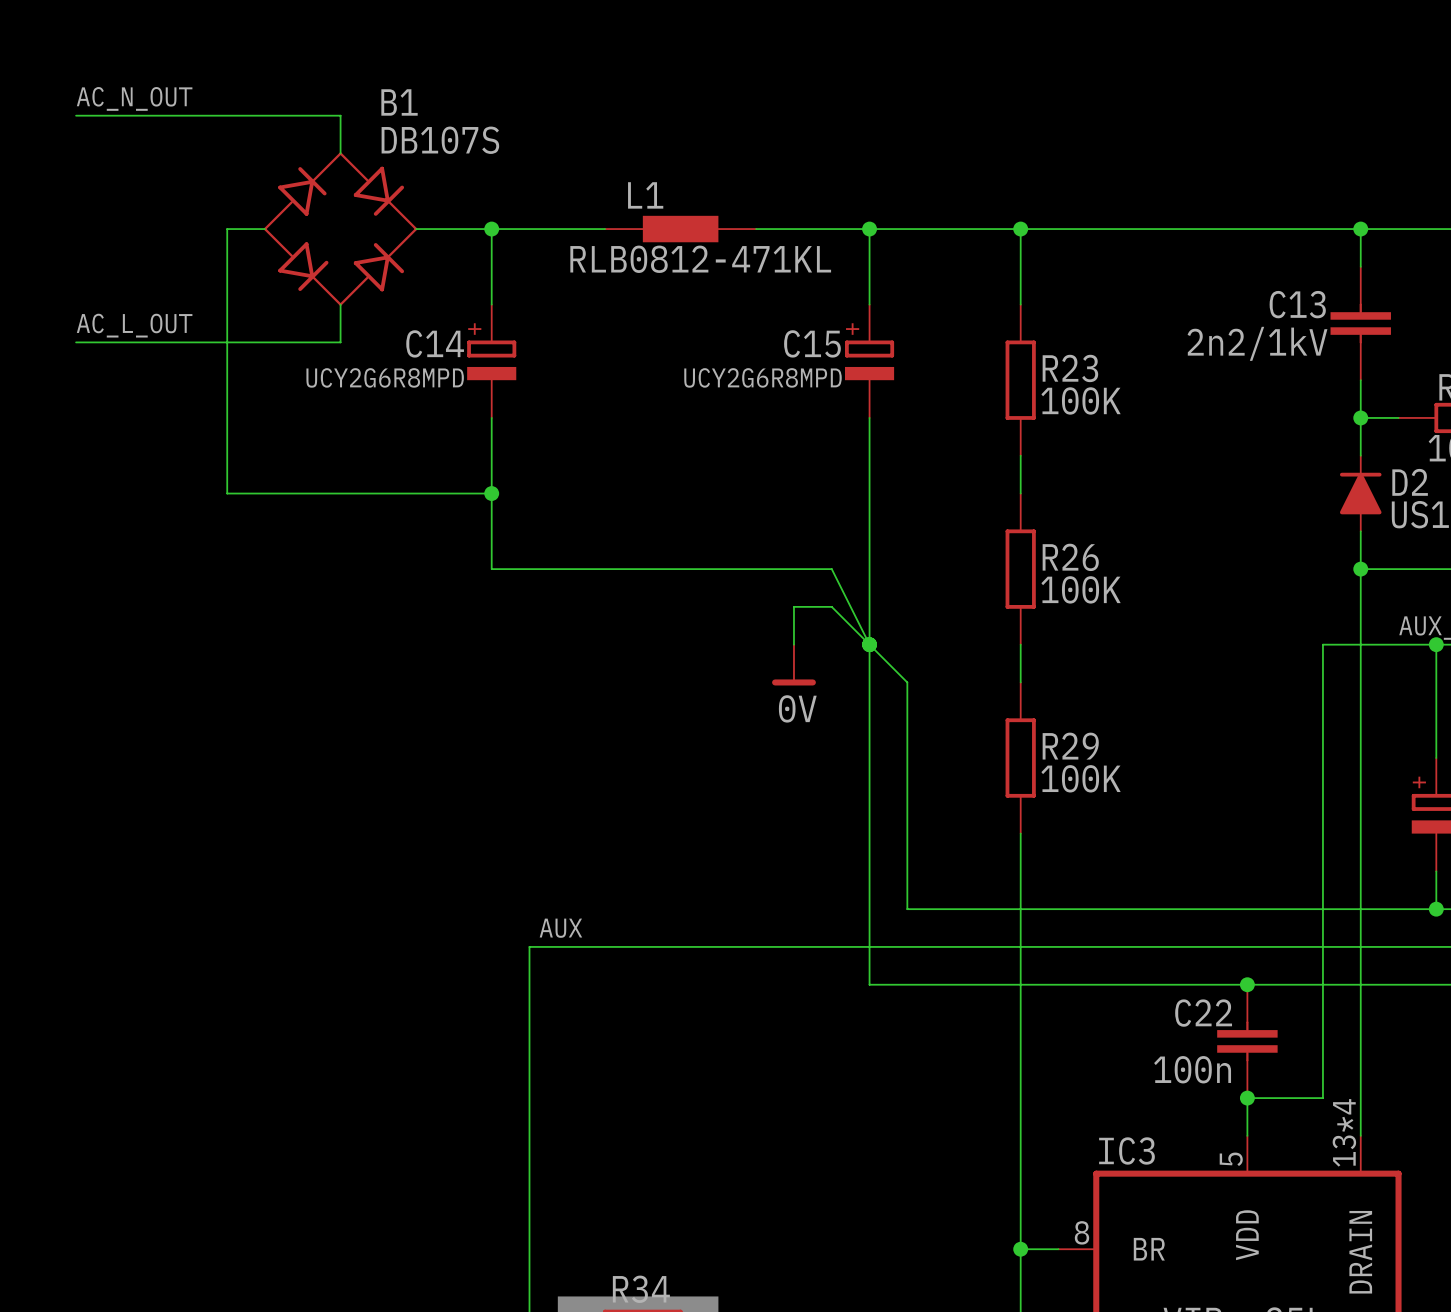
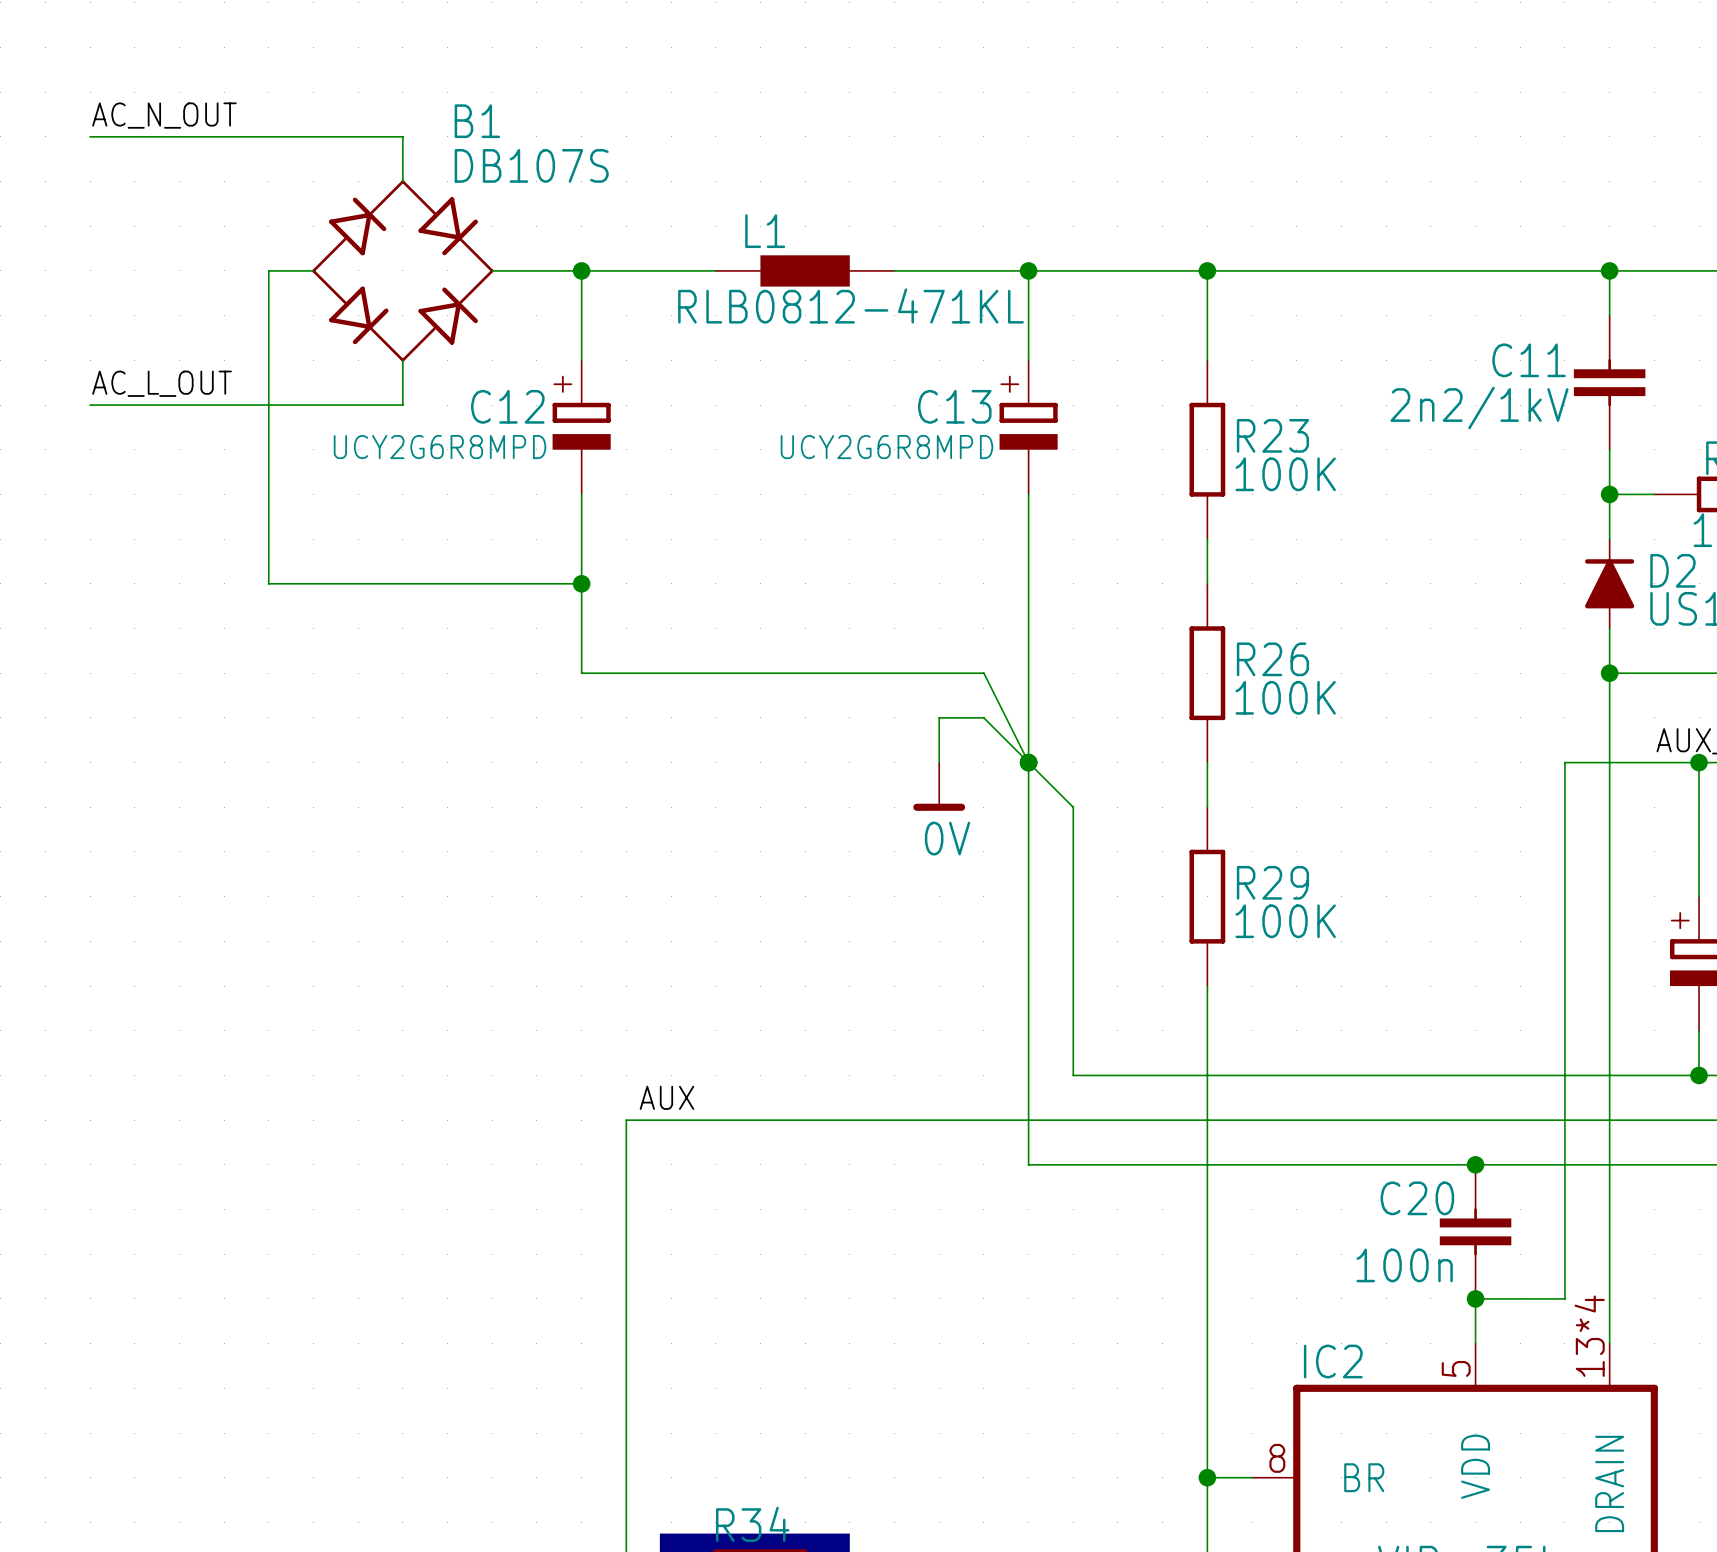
C13 name: C13 (1297, 304) -> C11 (1529, 360)
C14 name: C14 (435, 343) -> C12 (507, 406)
C15 name: C15 (812, 343) -> C13 (954, 406)
C22 name: C22 (1203, 1013) -> C20 (1417, 1198)
IC3 name: IC3 (1126, 1150) -> IC2 (1333, 1361)

